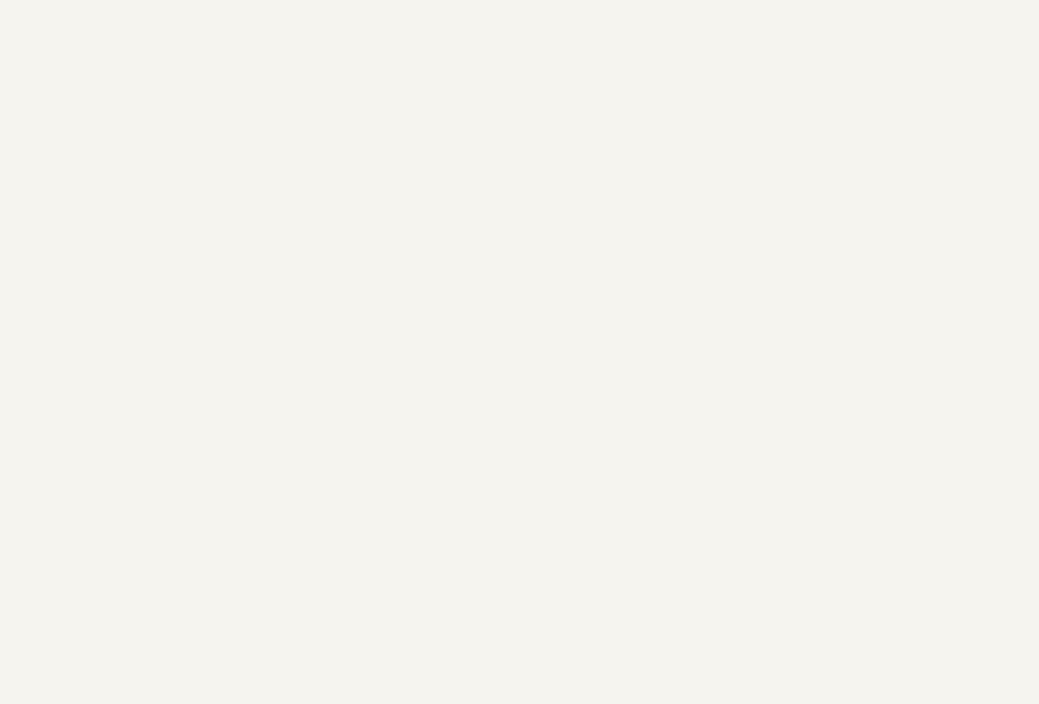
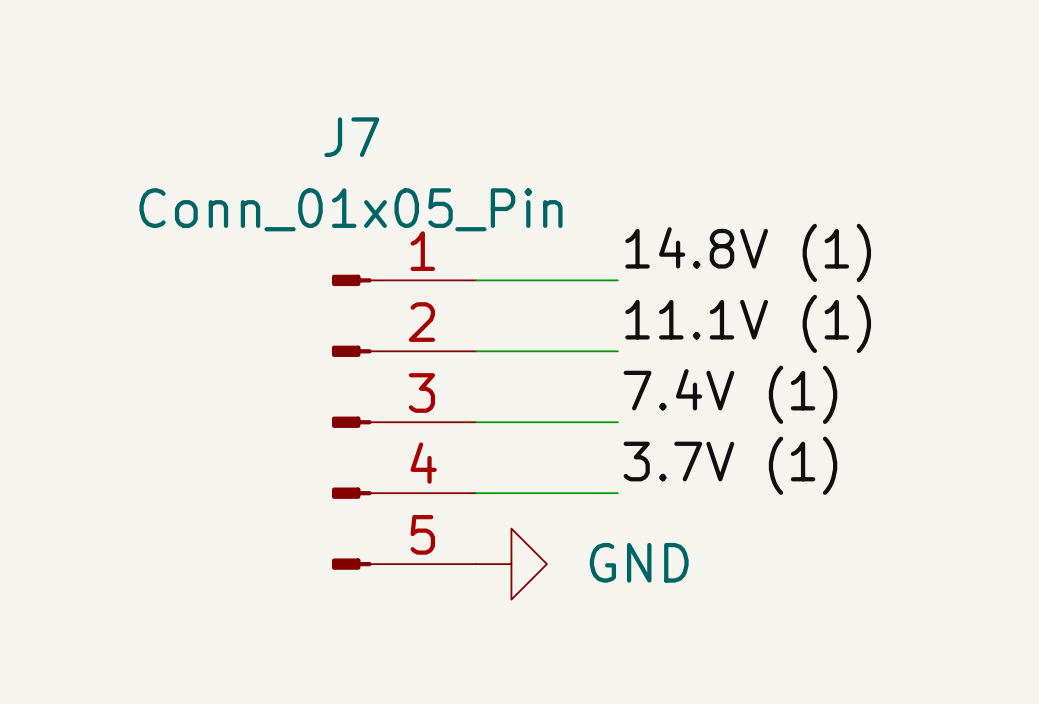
label: none -> 14.8V (1) (748, 252)
wire: none -> (475, 280) (617, 280)
label: none -> 11.1V (1) (748, 323)
wire: none -> (475, 351) (617, 351)
label: none -> 7.4V (1) (730, 394)
J7: none -> Conn_01x05_Pin (403, 422)
wire: none -> (475, 422) (617, 422)
label: none -> 3.7V (1) (730, 465)
wire: none -> (475, 493) (617, 493)
power symbol: none -> GND (511, 564)

